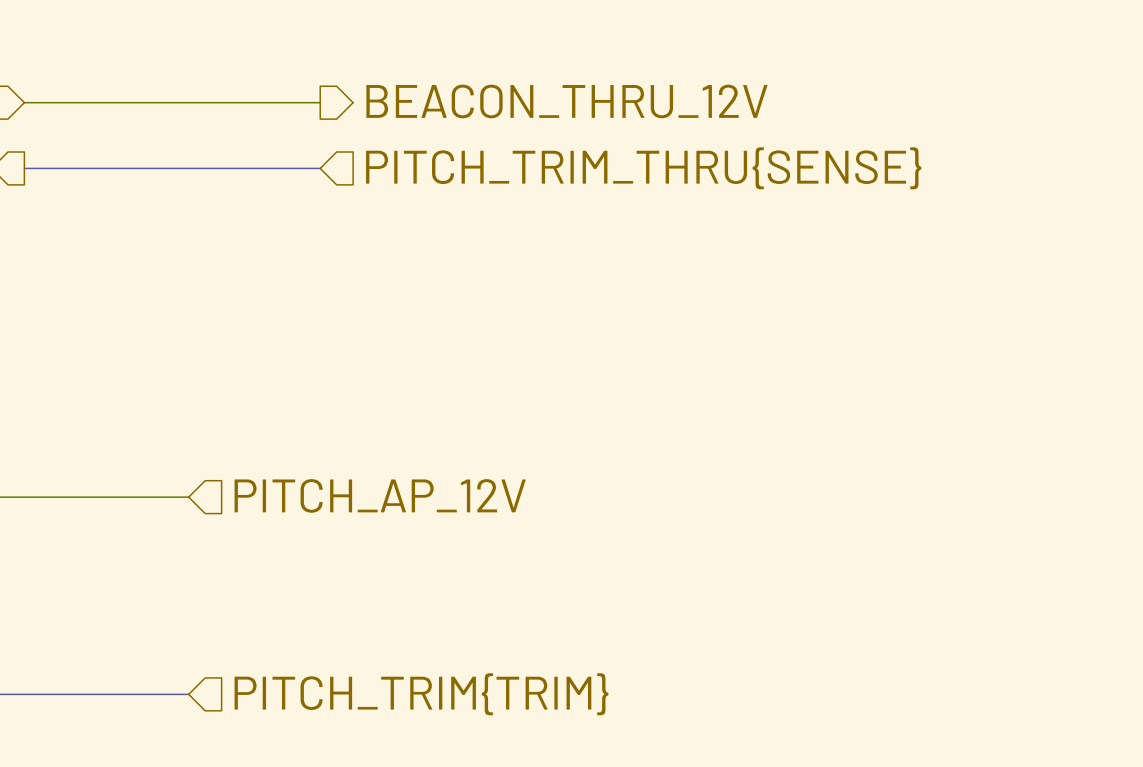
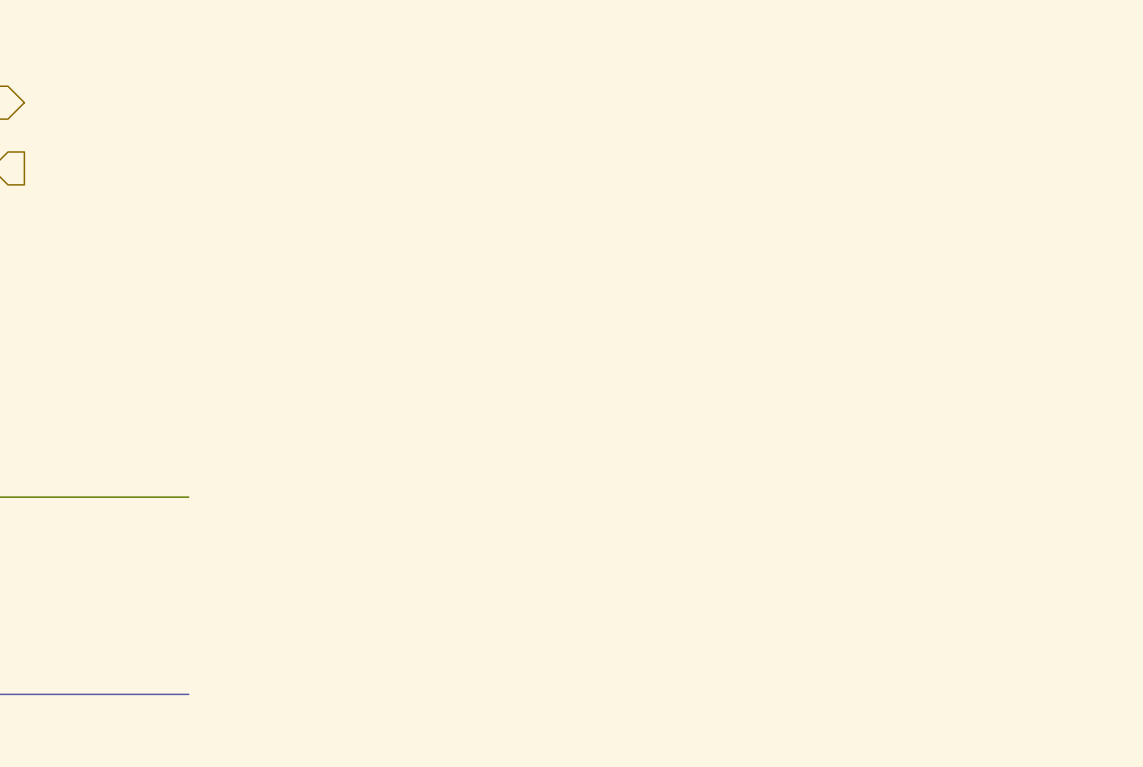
hierarchical label: BEACON_THRU_12V (566, 101) -> none
wire: (24, 102) (320, 102) -> none
bus: (24, 168) (320, 168) -> none
hierarchical label: PITCH_TRIM_THRU{SENSE} (643, 168) -> none
hierarchical label: PITCH_AP_12V (380, 495) -> none
hierarchical label: PITCH_TRIM{TRIM} (421, 694) -> none

